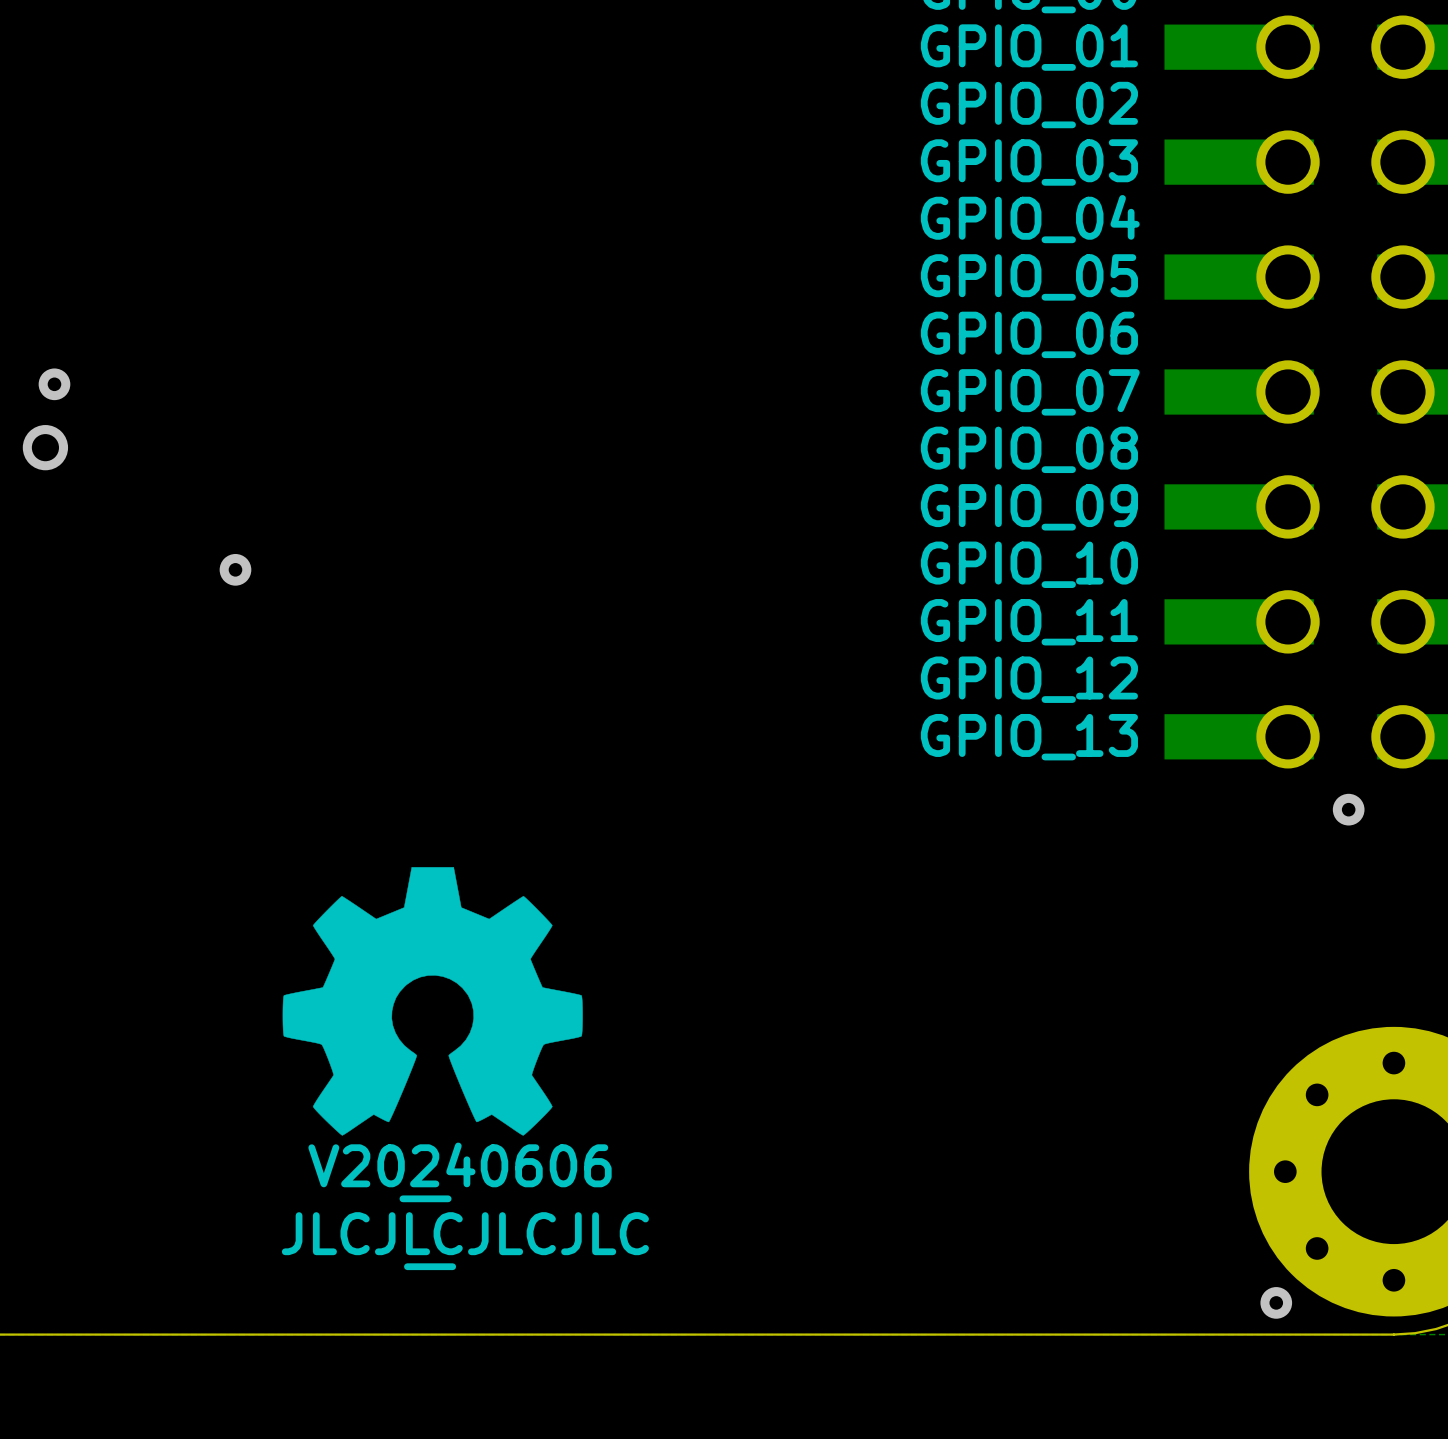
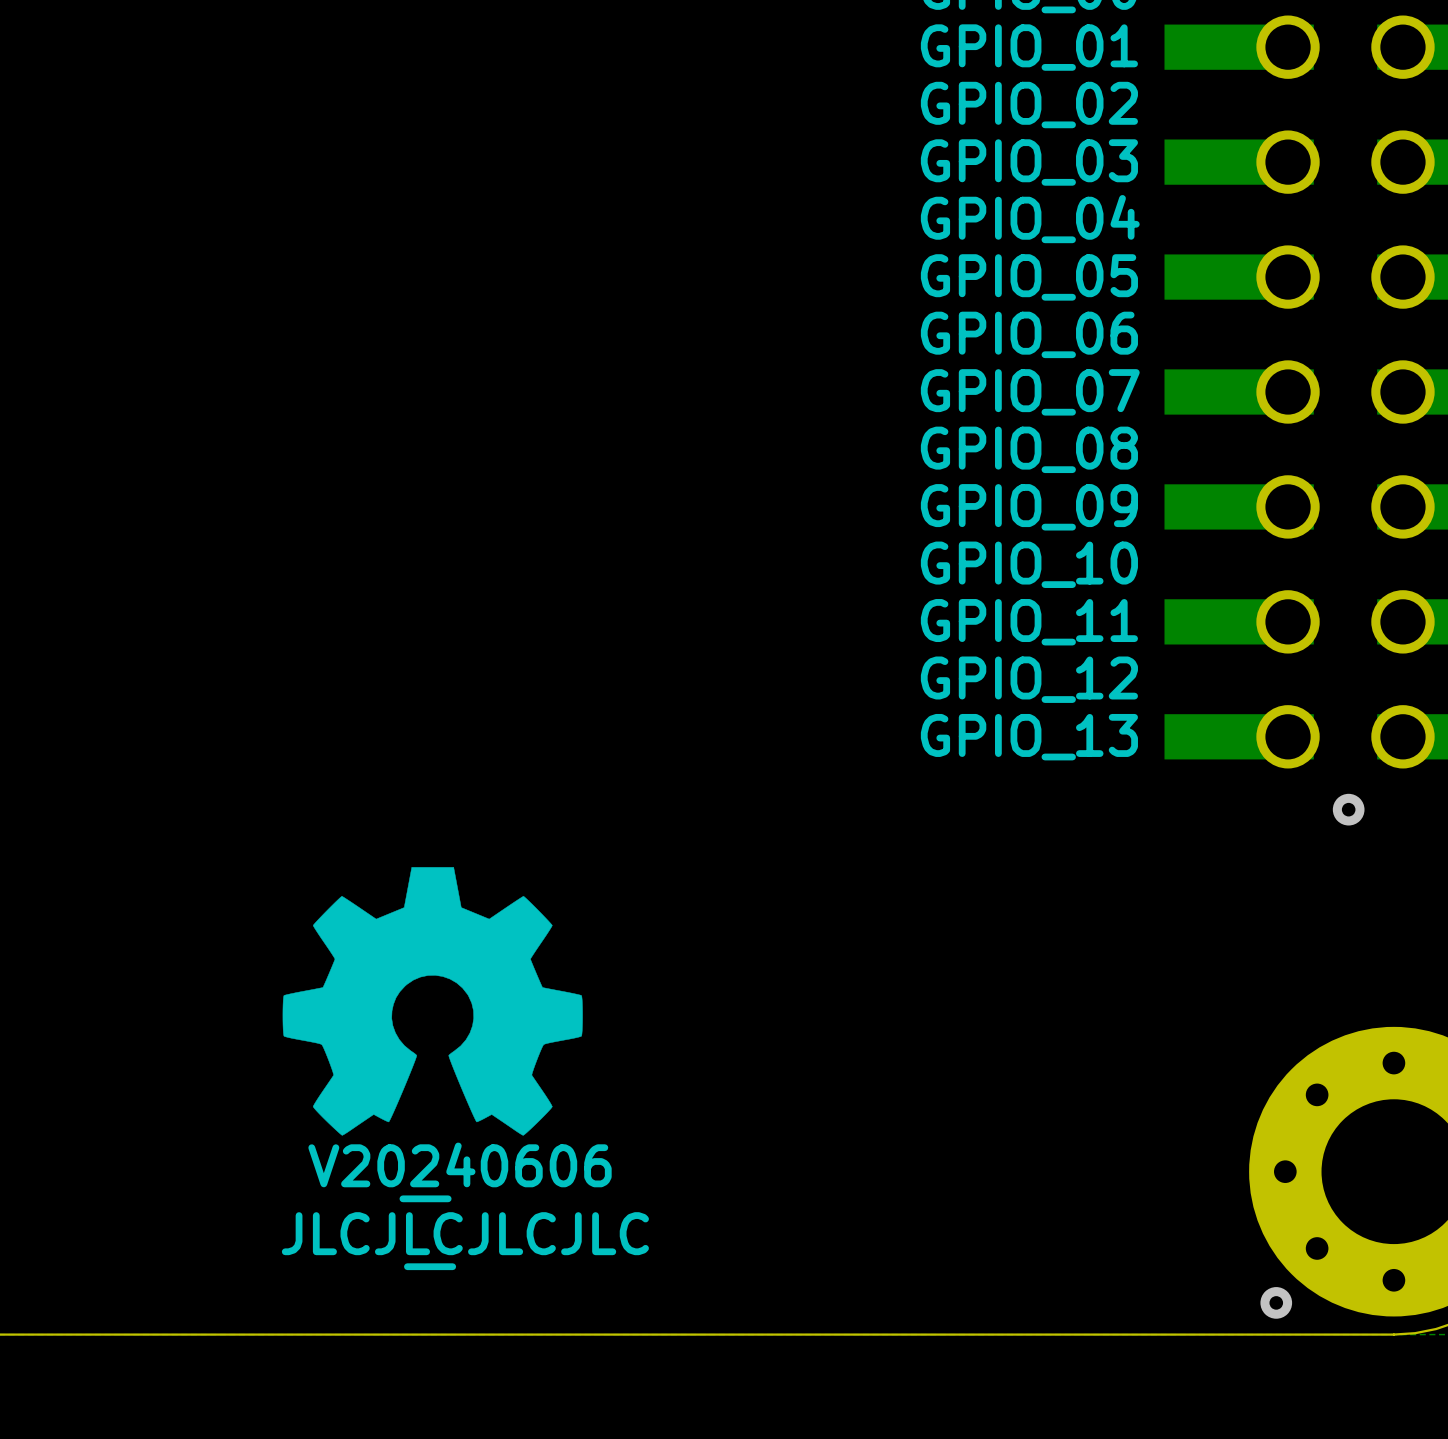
via: (54, 384) -> none
via: (45, 447) -> none
via: (235, 569) -> none

